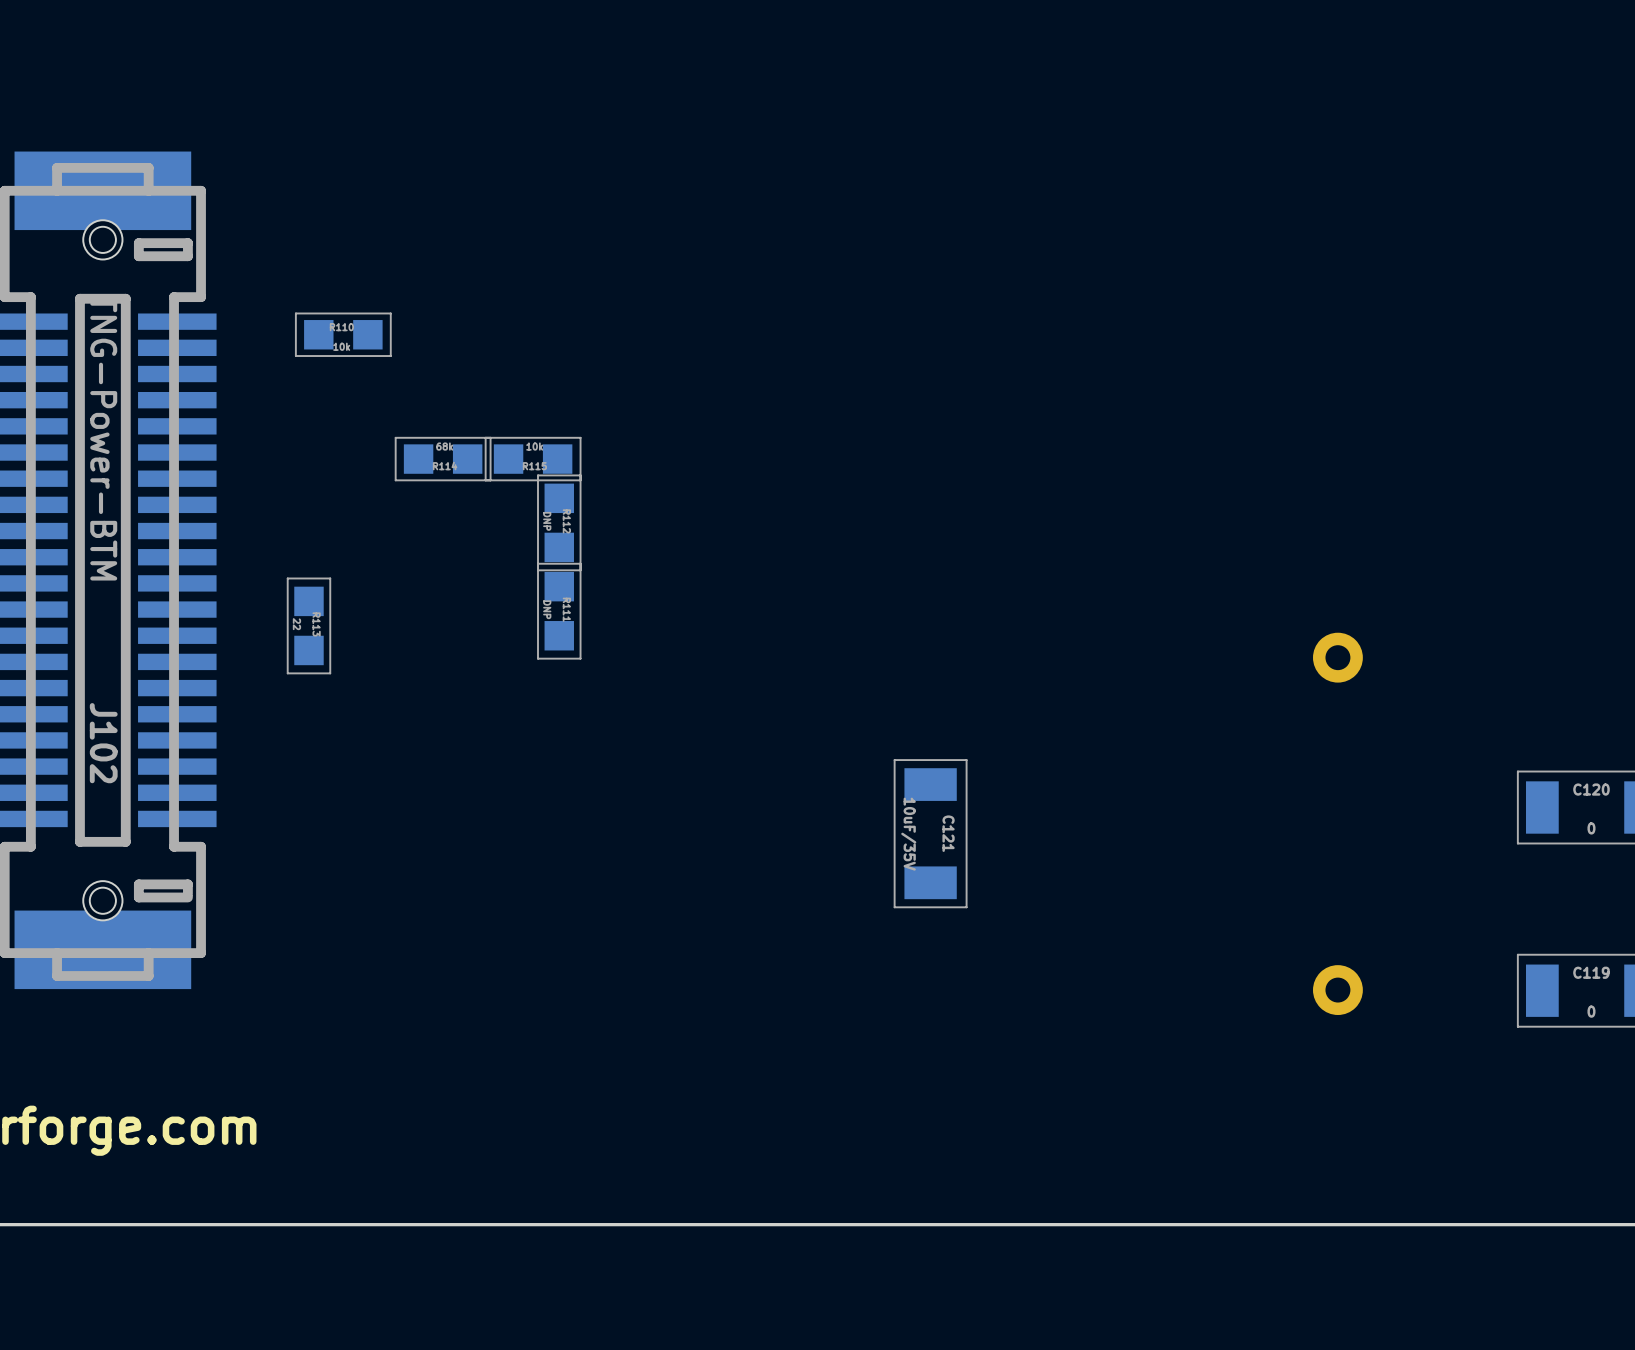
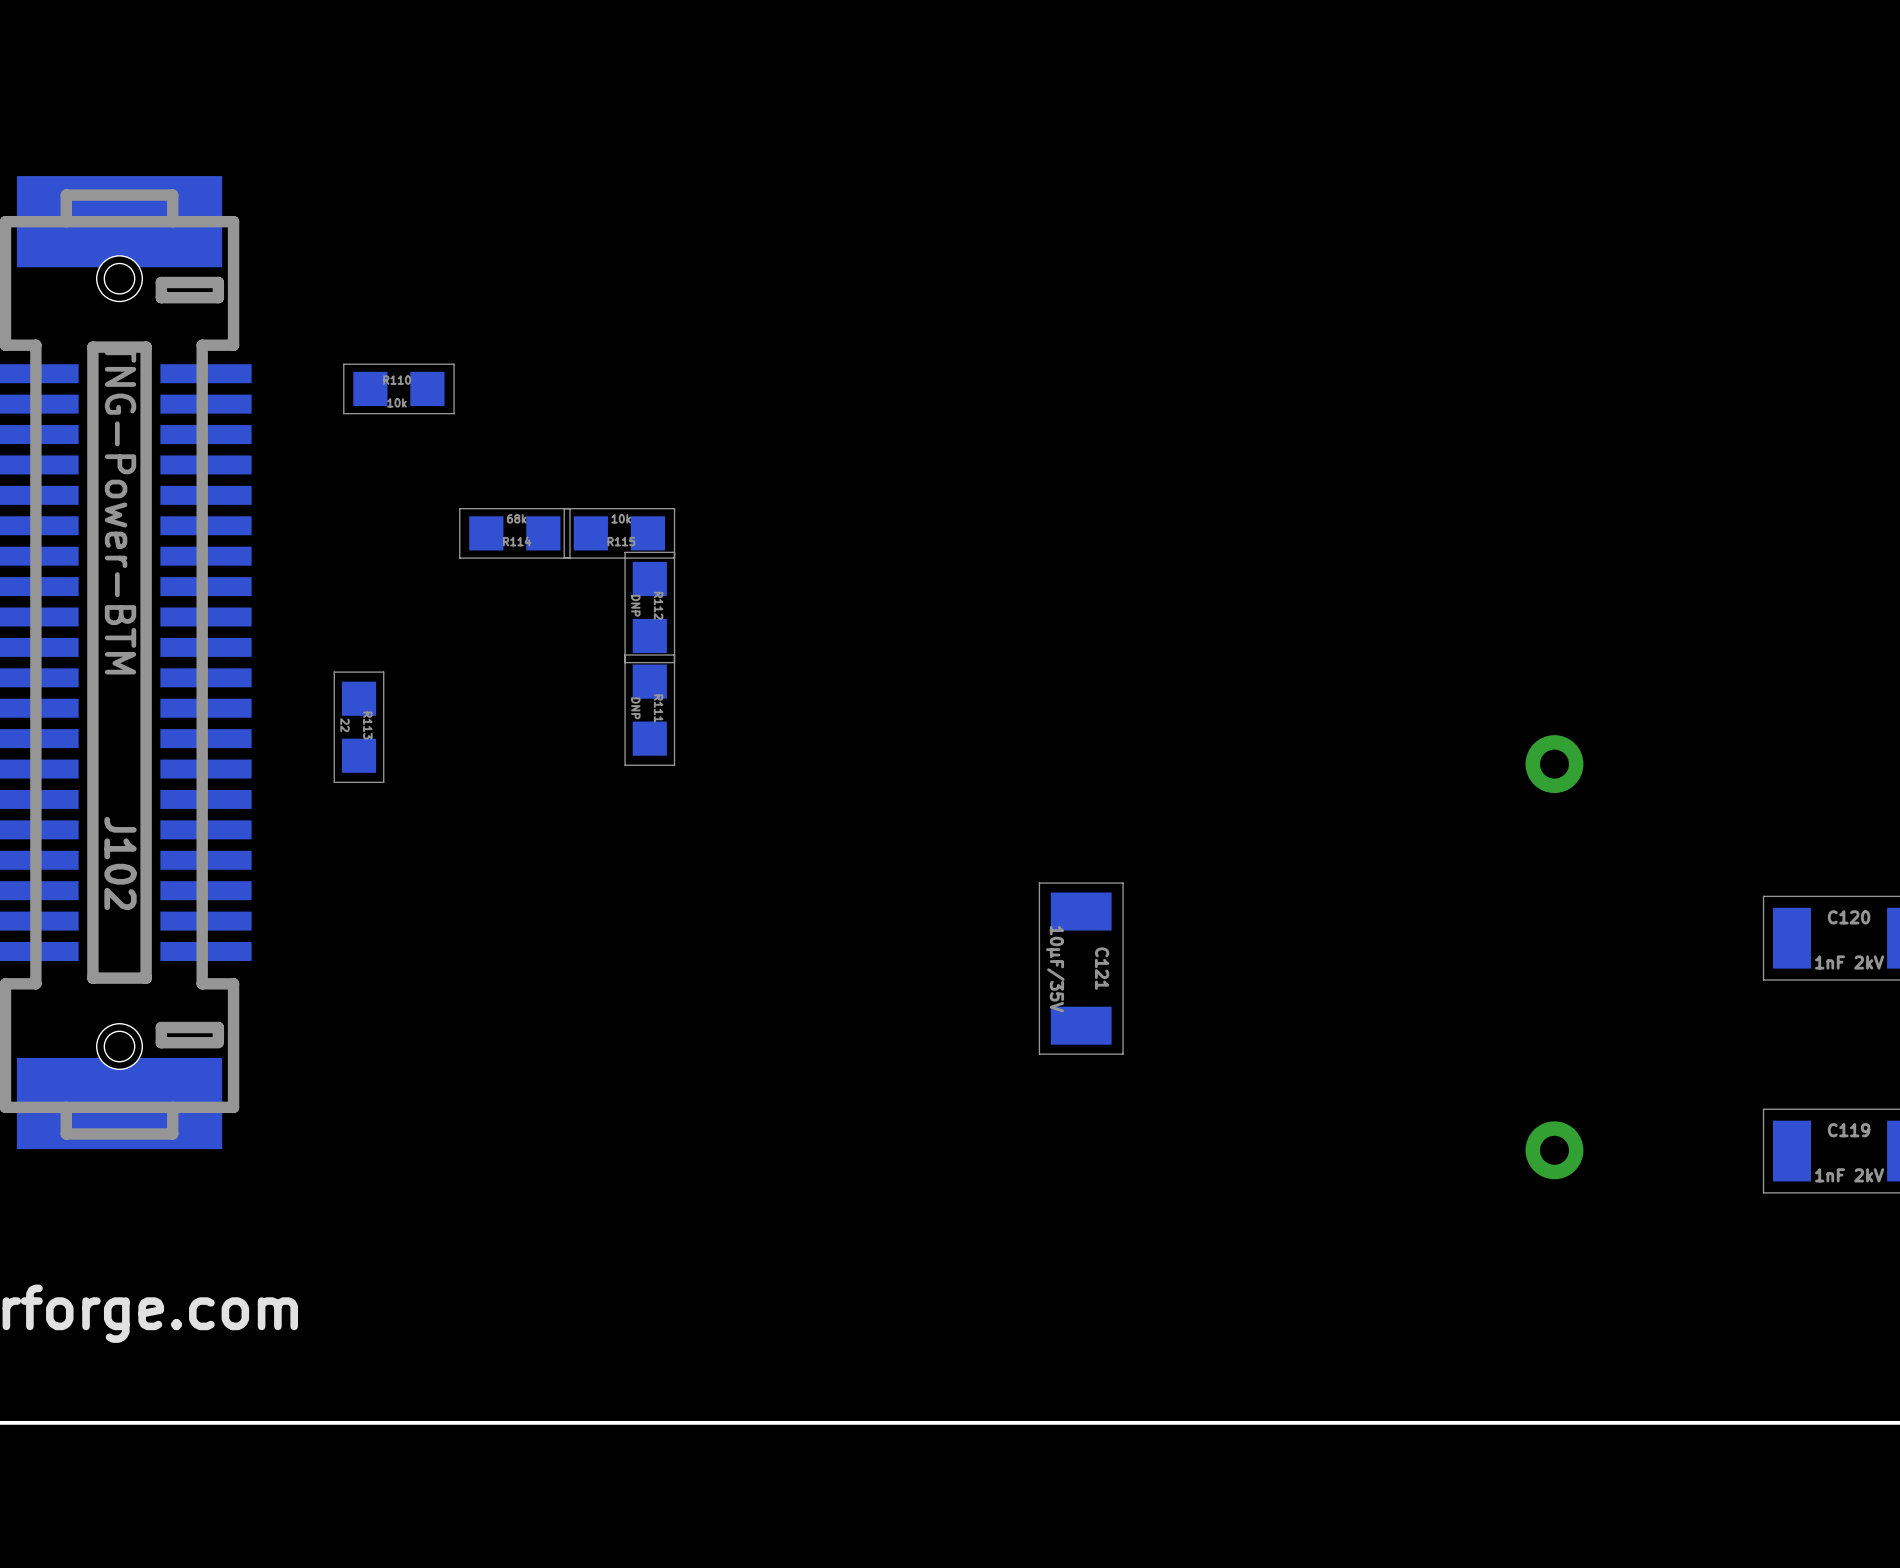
C120 value: 0 (1591, 828) -> 1nF 2kV (1849, 962)
C121 value: 10uF/35V (908, 834) -> 10µF/35V (1055, 969)
C119 value: 0 (1591, 1011) -> 1nF 2kV (1849, 1175)

